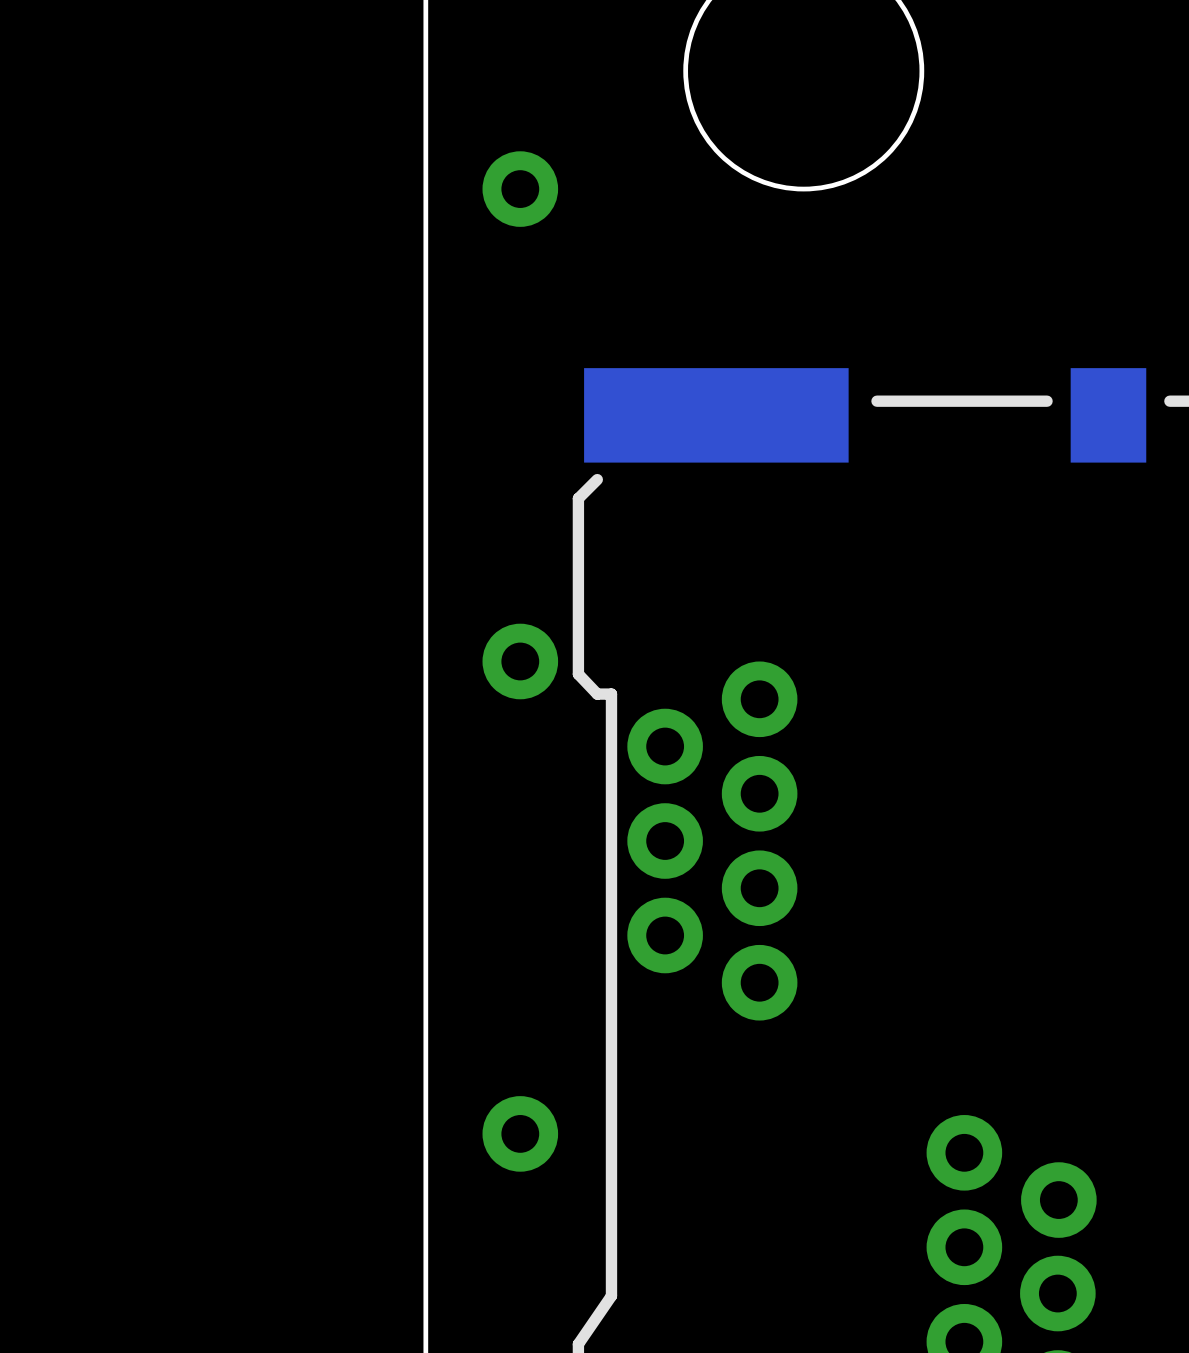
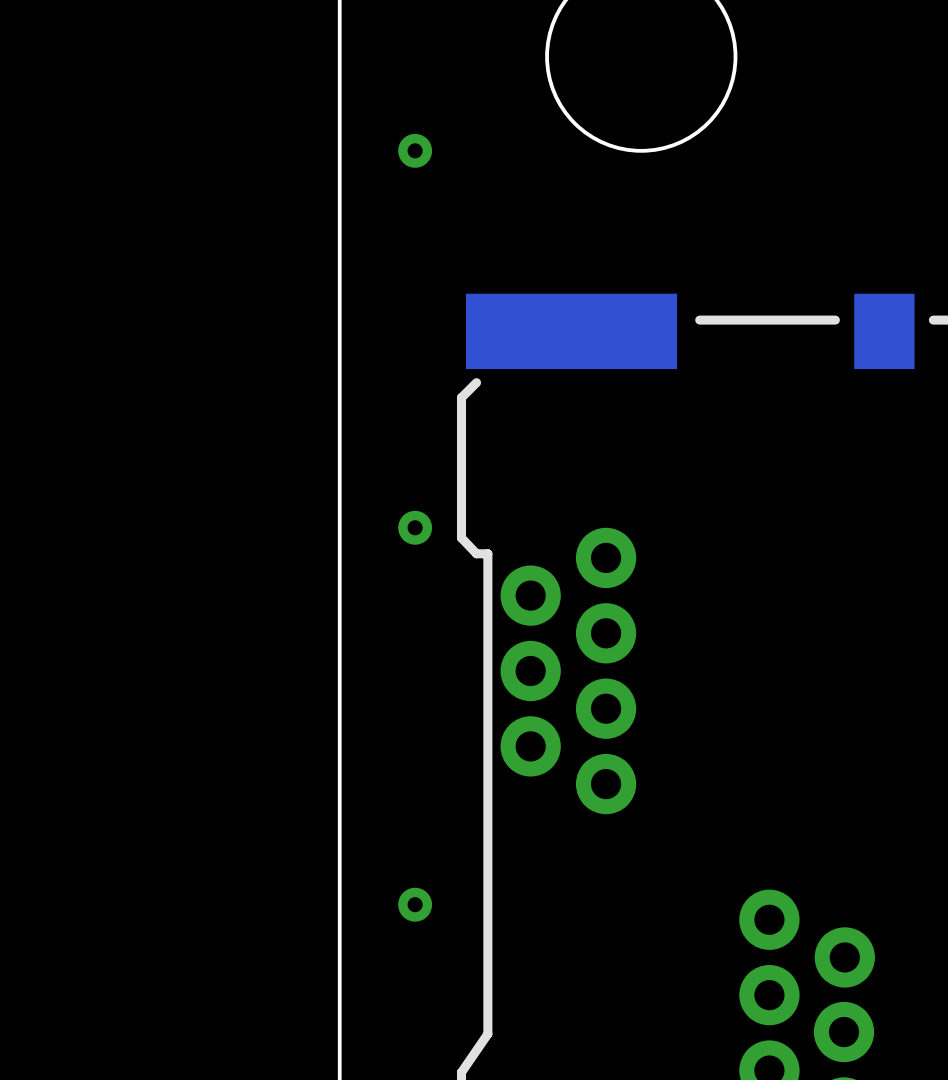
via size: [482, 151, 559, 227] -> [398, 133, 433, 168]
via size: [482, 623, 559, 700] -> [398, 510, 433, 545]
via size: [482, 1096, 559, 1172] -> [398, 887, 433, 922]

